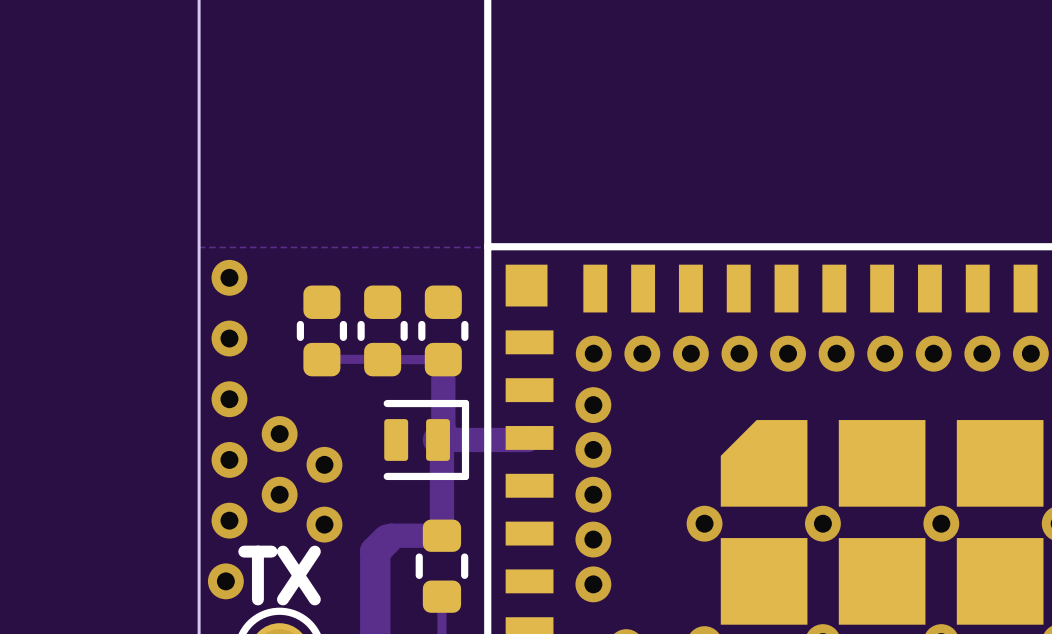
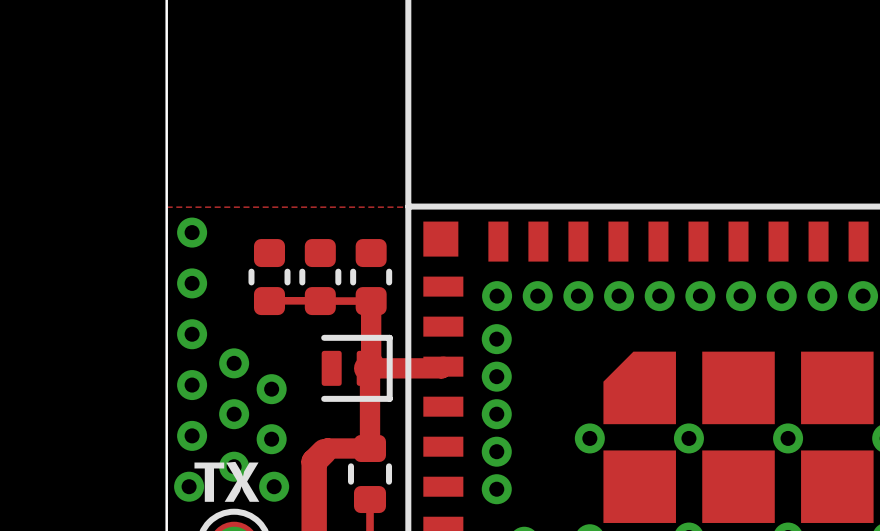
via: none -> (234, 466)
via: none -> (274, 486)

